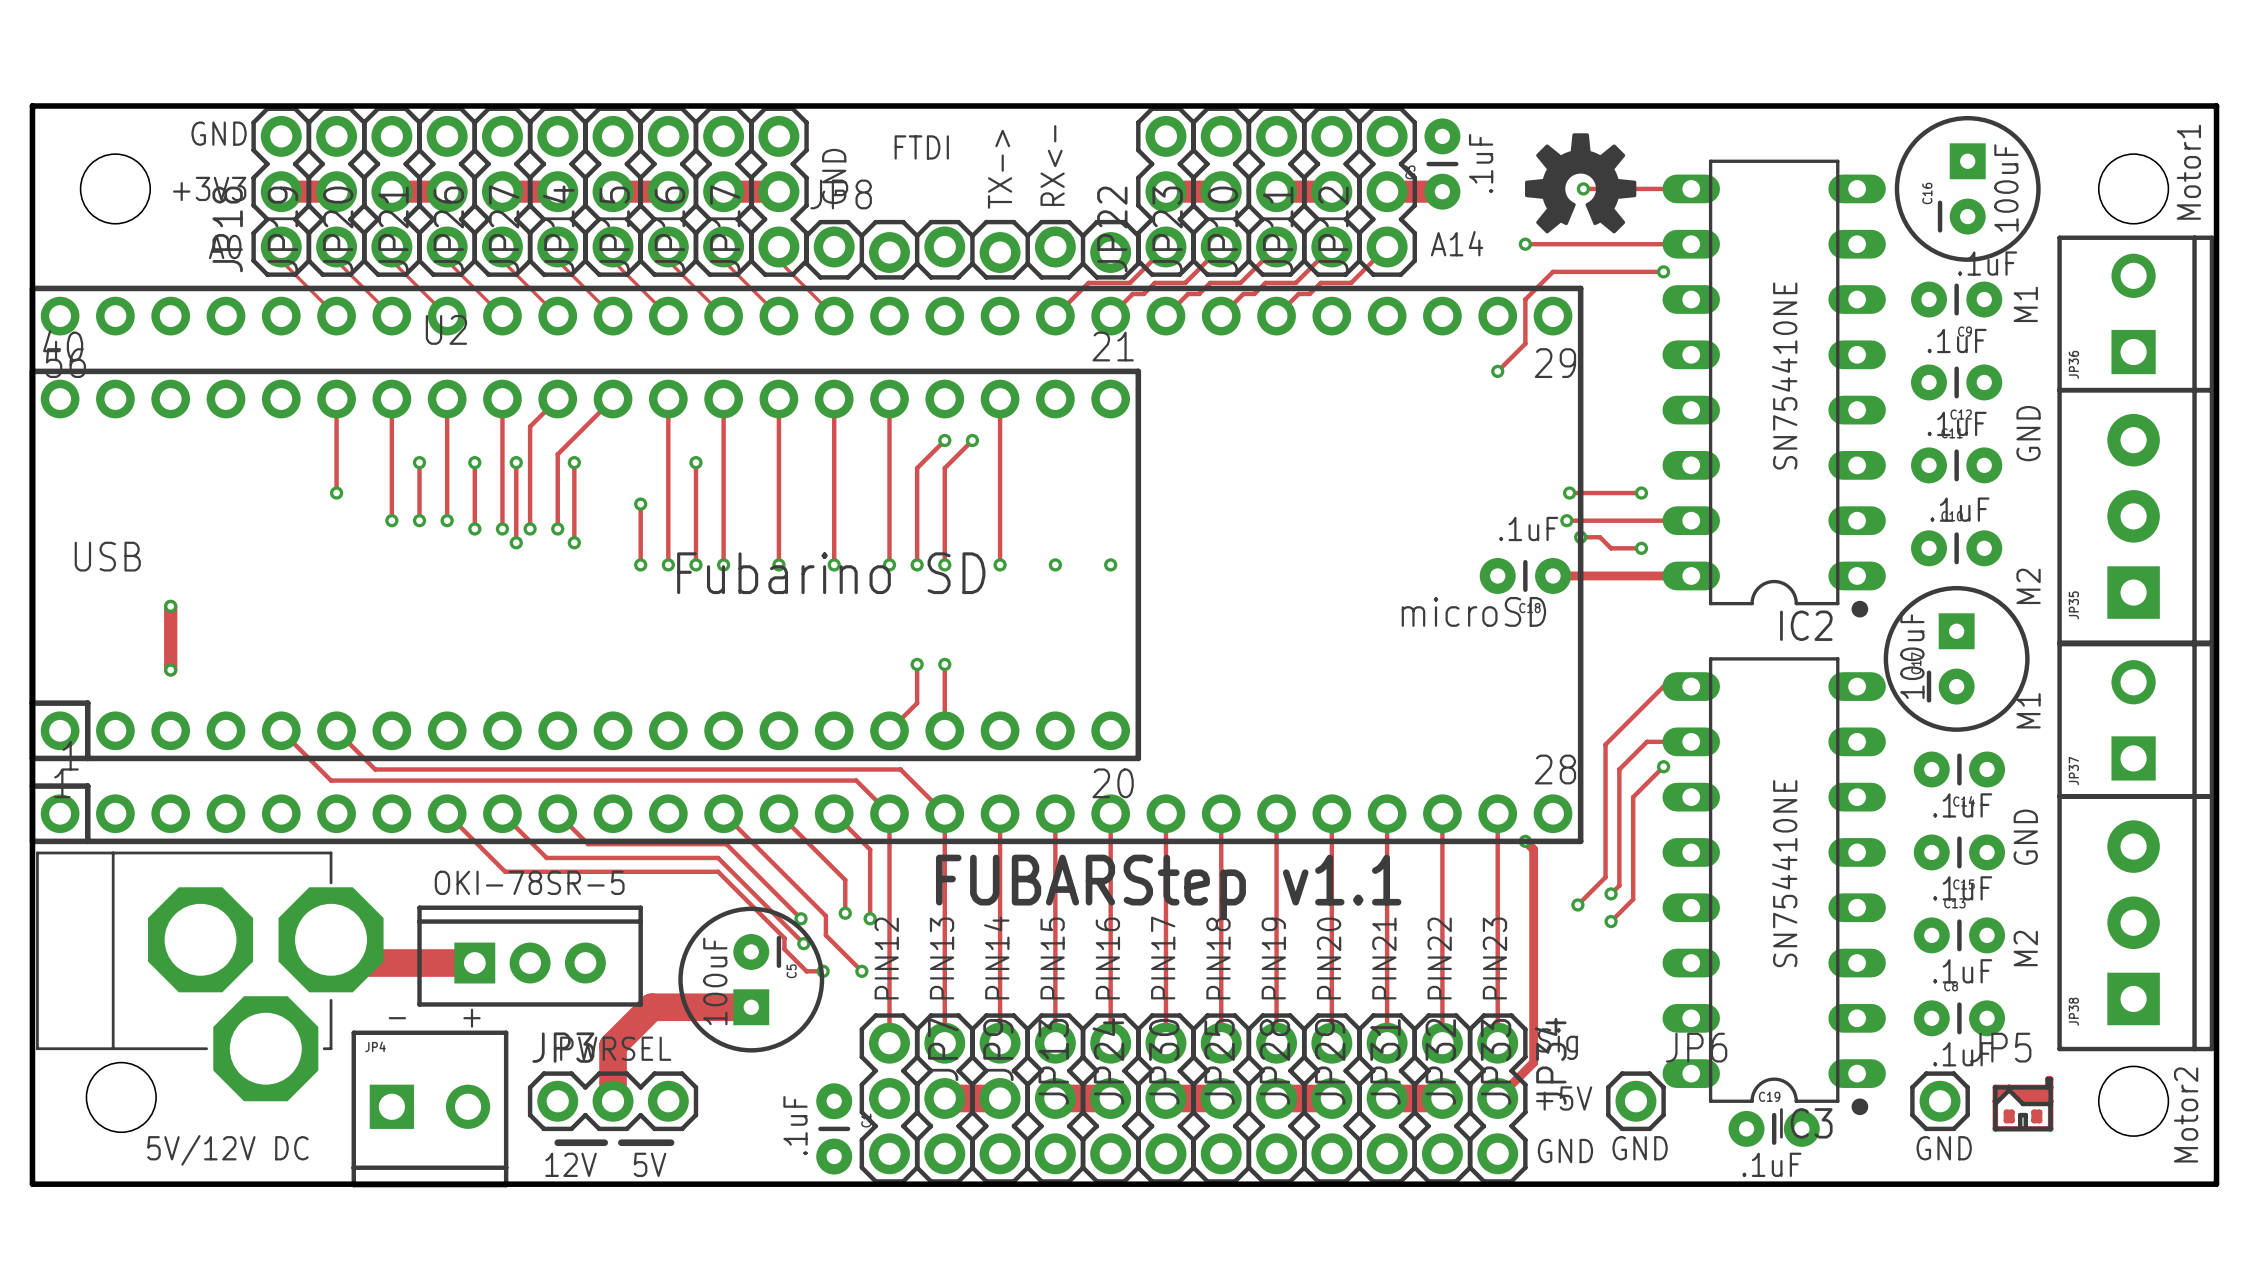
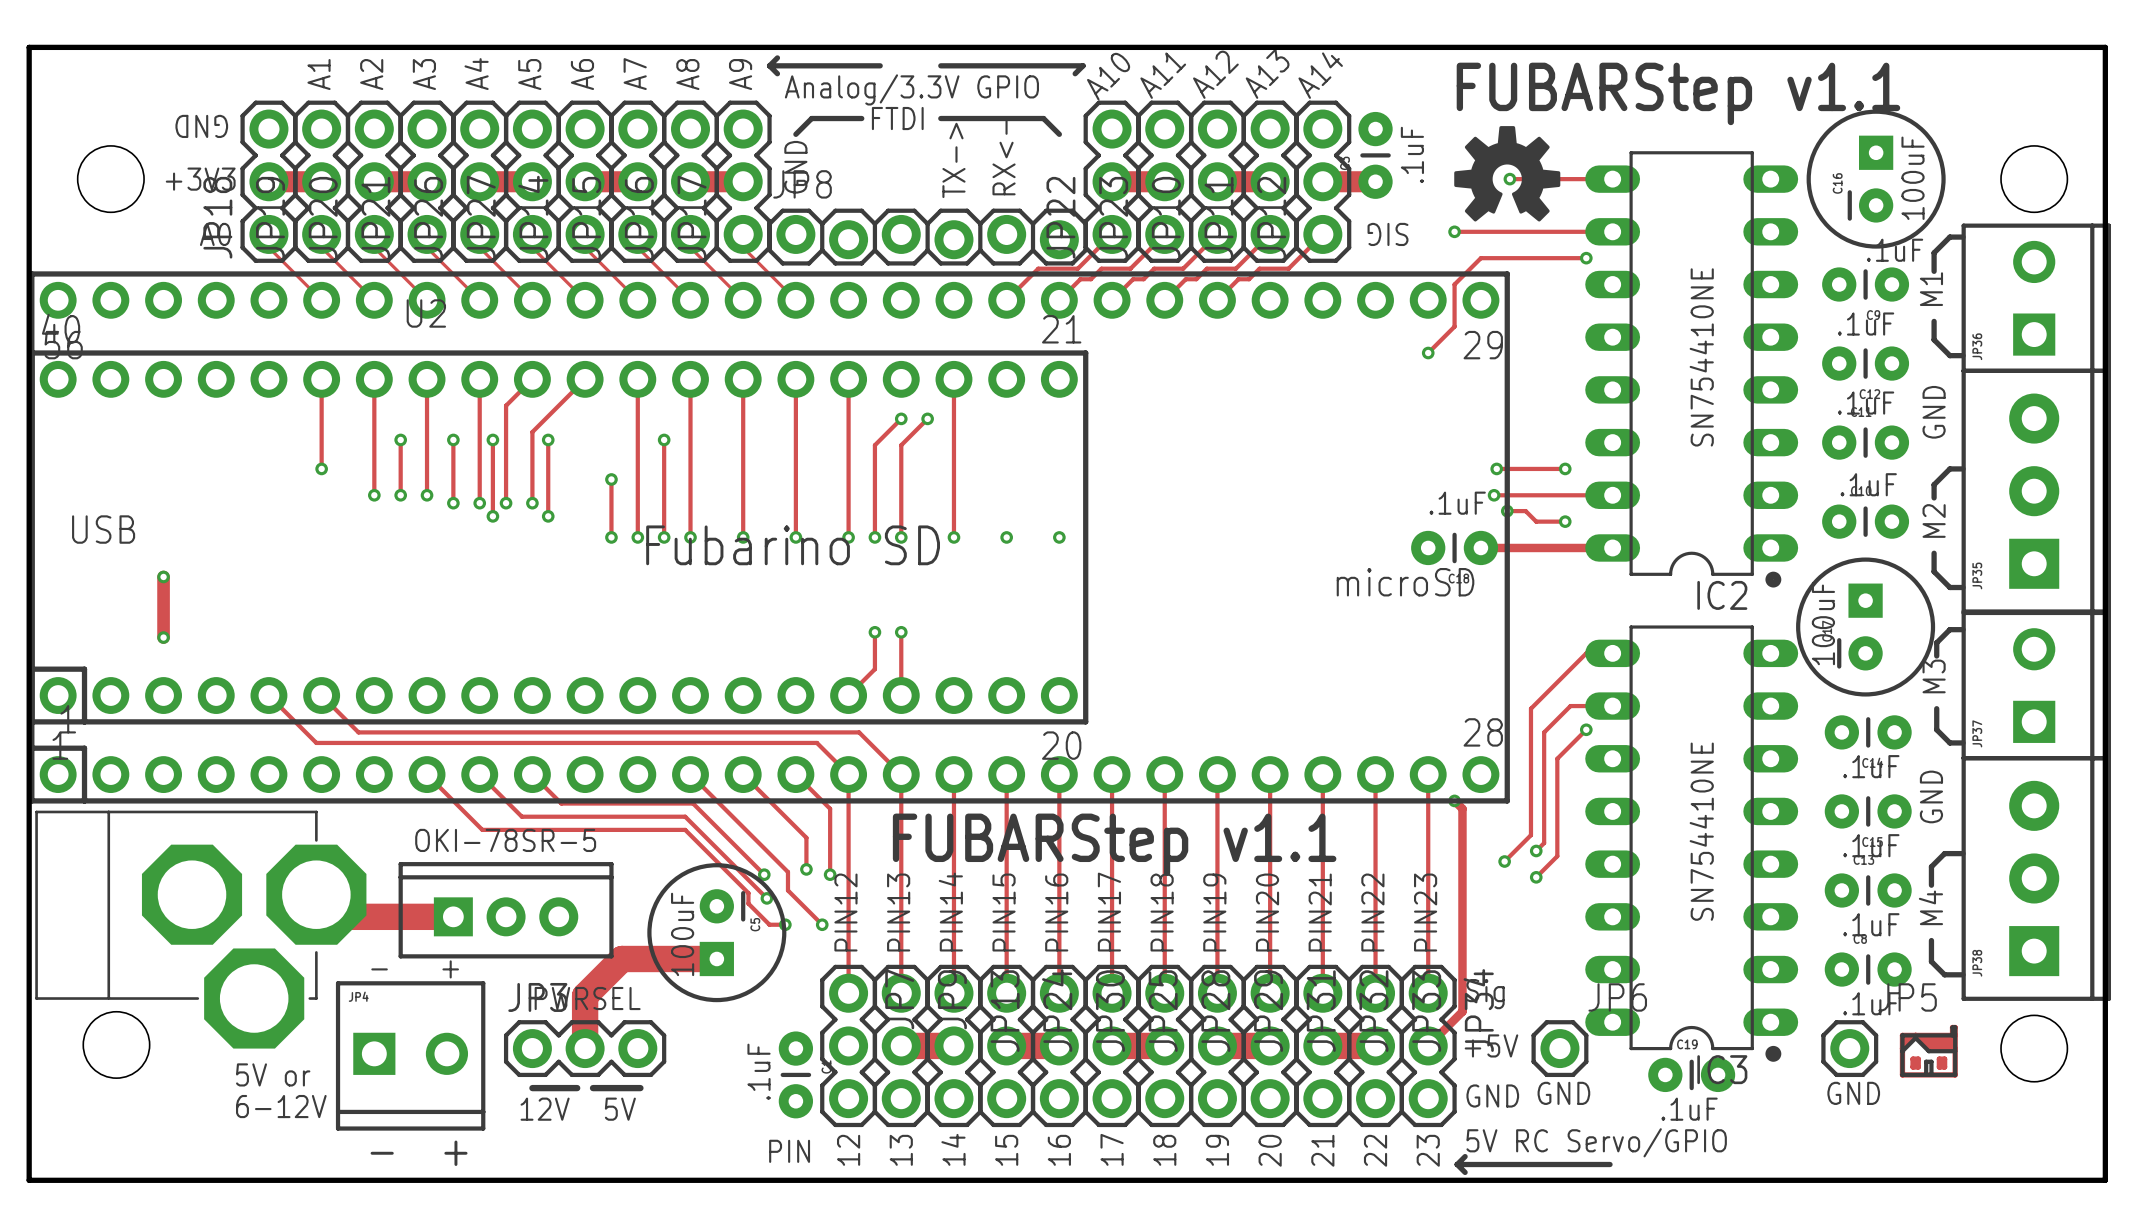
line: none -> (777, 57) (769, 65)
line: none -> (769, 65) (880, 65)
line: none -> (769, 65) (777, 73)
line: none -> (940, 65) (1083, 65) (1075, 73)
text: none -> A4 (476, 74)
text: none -> A7 (635, 74)
text: none -> A13 (1267, 73)
text: none -> A1 (319, 74)
text: none -> A2 (371, 74)
text: none -> A3 (424, 74)
text: none -> A5 (529, 74)
text: none -> A6 (582, 74)
text: none -> A8 (687, 74)
text: none -> A9 (740, 74)
text: none -> A12 (1215, 74)
text: none -> A11 (1163, 75)
text: none -> A10 (1108, 76)
text: none -> Analog/3.3V GPIO (911, 89)
text: none -> FUBARStep v1.1 (1678, 93)
board edge: (32, 105) (2216, 105) (2216, 1184) (32, 1184) (32, 105) -> (29, 47) (29, 1180) (2105, 1180) (2105, 47) (29, 47)
line: none -> (861, 118) (811, 118) (795, 134)
line: none -> (940, 118) (1043, 118) (1059, 134)
text rotation: 0° (219, 133) -> 180° (201, 126)
text position: FTDI (921, 147) -> FTDI (897, 118)
text: Motor1 (2188, 172) -> none
text rotation: 0° (1457, 243) -> 45° counterclockwise (1320, 75)
text position: A14 (1457, 243) -> A14 (1320, 75)
text: none -> SIG (1387, 234)
line: none -> (1963, 237) (1949, 237) (1934, 252) (1934, 271)
line: none -> (1934, 321) (1934, 339) (1949, 355) (1963, 355)
line: none -> (1963, 468) (1949, 468) (1934, 484) (1934, 497)
line: none -> (1934, 553) (1934, 571) (1949, 587) (1963, 587)
text position: M2 (2028, 586) -> M2 (1934, 521)
line: none -> (1963, 629) (1949, 629) (1936, 642) (1936, 656)
text: M1 (2028, 710) -> M3 (1934, 676)
line: none -> (1936, 708) (1936, 729) (1949, 742) (1963, 742)
line: none -> (1963, 853) (1944, 853) (1931, 866) (1931, 885)
text: M2 (2025, 948) -> M4 (1930, 907)
line: none -> (1931, 940) (1931, 961) (1944, 974) (1963, 974)
text: Motor2 (2186, 1114) -> none
text: none -> 5V or (273, 1074)
text: 5V/12V DC (227, 1150) -> none
text: none -> 6-12V (281, 1106)
text: none -> 5V RC Servo/GPIO (1596, 1142)
text: none -> 14 (953, 1149)
text: none -> 17 (1112, 1149)
text: none -> 12 (848, 1150)
text: none -> 13 (901, 1150)
text: none -> 15 (1006, 1150)
text: none -> 16 (1059, 1150)
text: none -> 18 (1164, 1150)
text: none -> 19 (1217, 1150)
text: none -> 20 (1270, 1150)
text: none -> 21 (1322, 1150)
text: none -> 22 (1375, 1150)
text: none -> 23 (1428, 1150)
text: none -> PIN (789, 1151)
text: none -> - (382, 1153)
text: none -> + (455, 1153)
line: none -> (1465, 1156) (1457, 1164)
line: none -> (1457, 1164) (1610, 1164)
line: none -> (1457, 1164) (1465, 1172)

